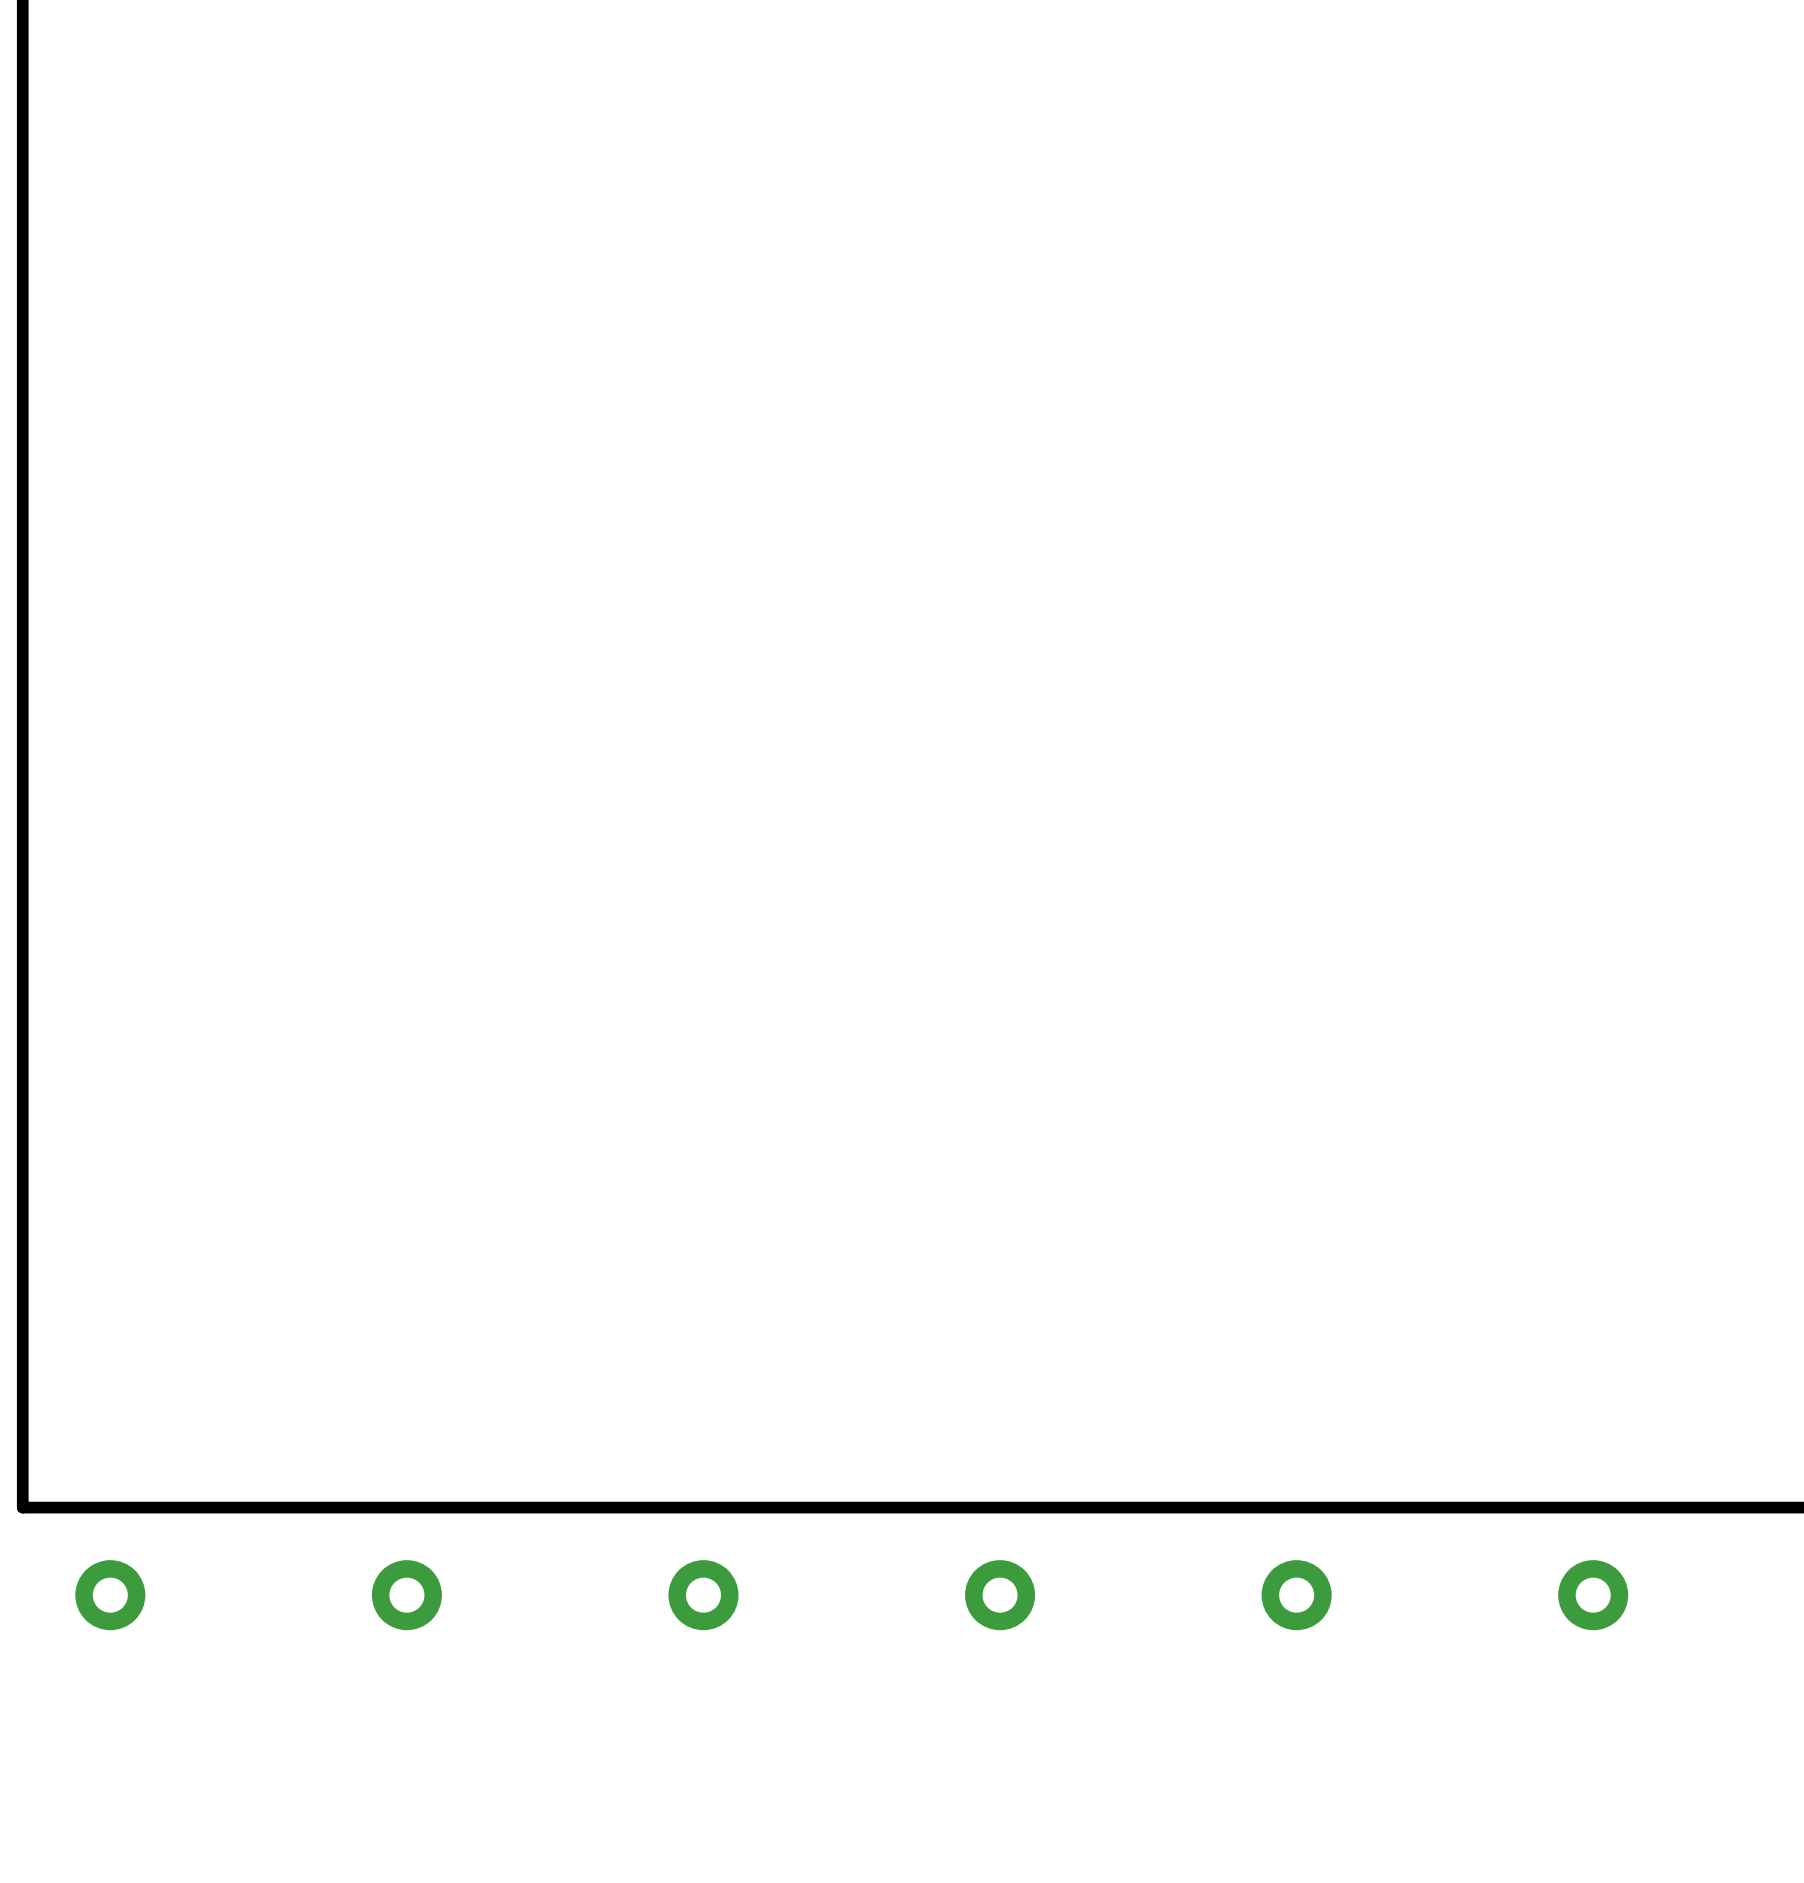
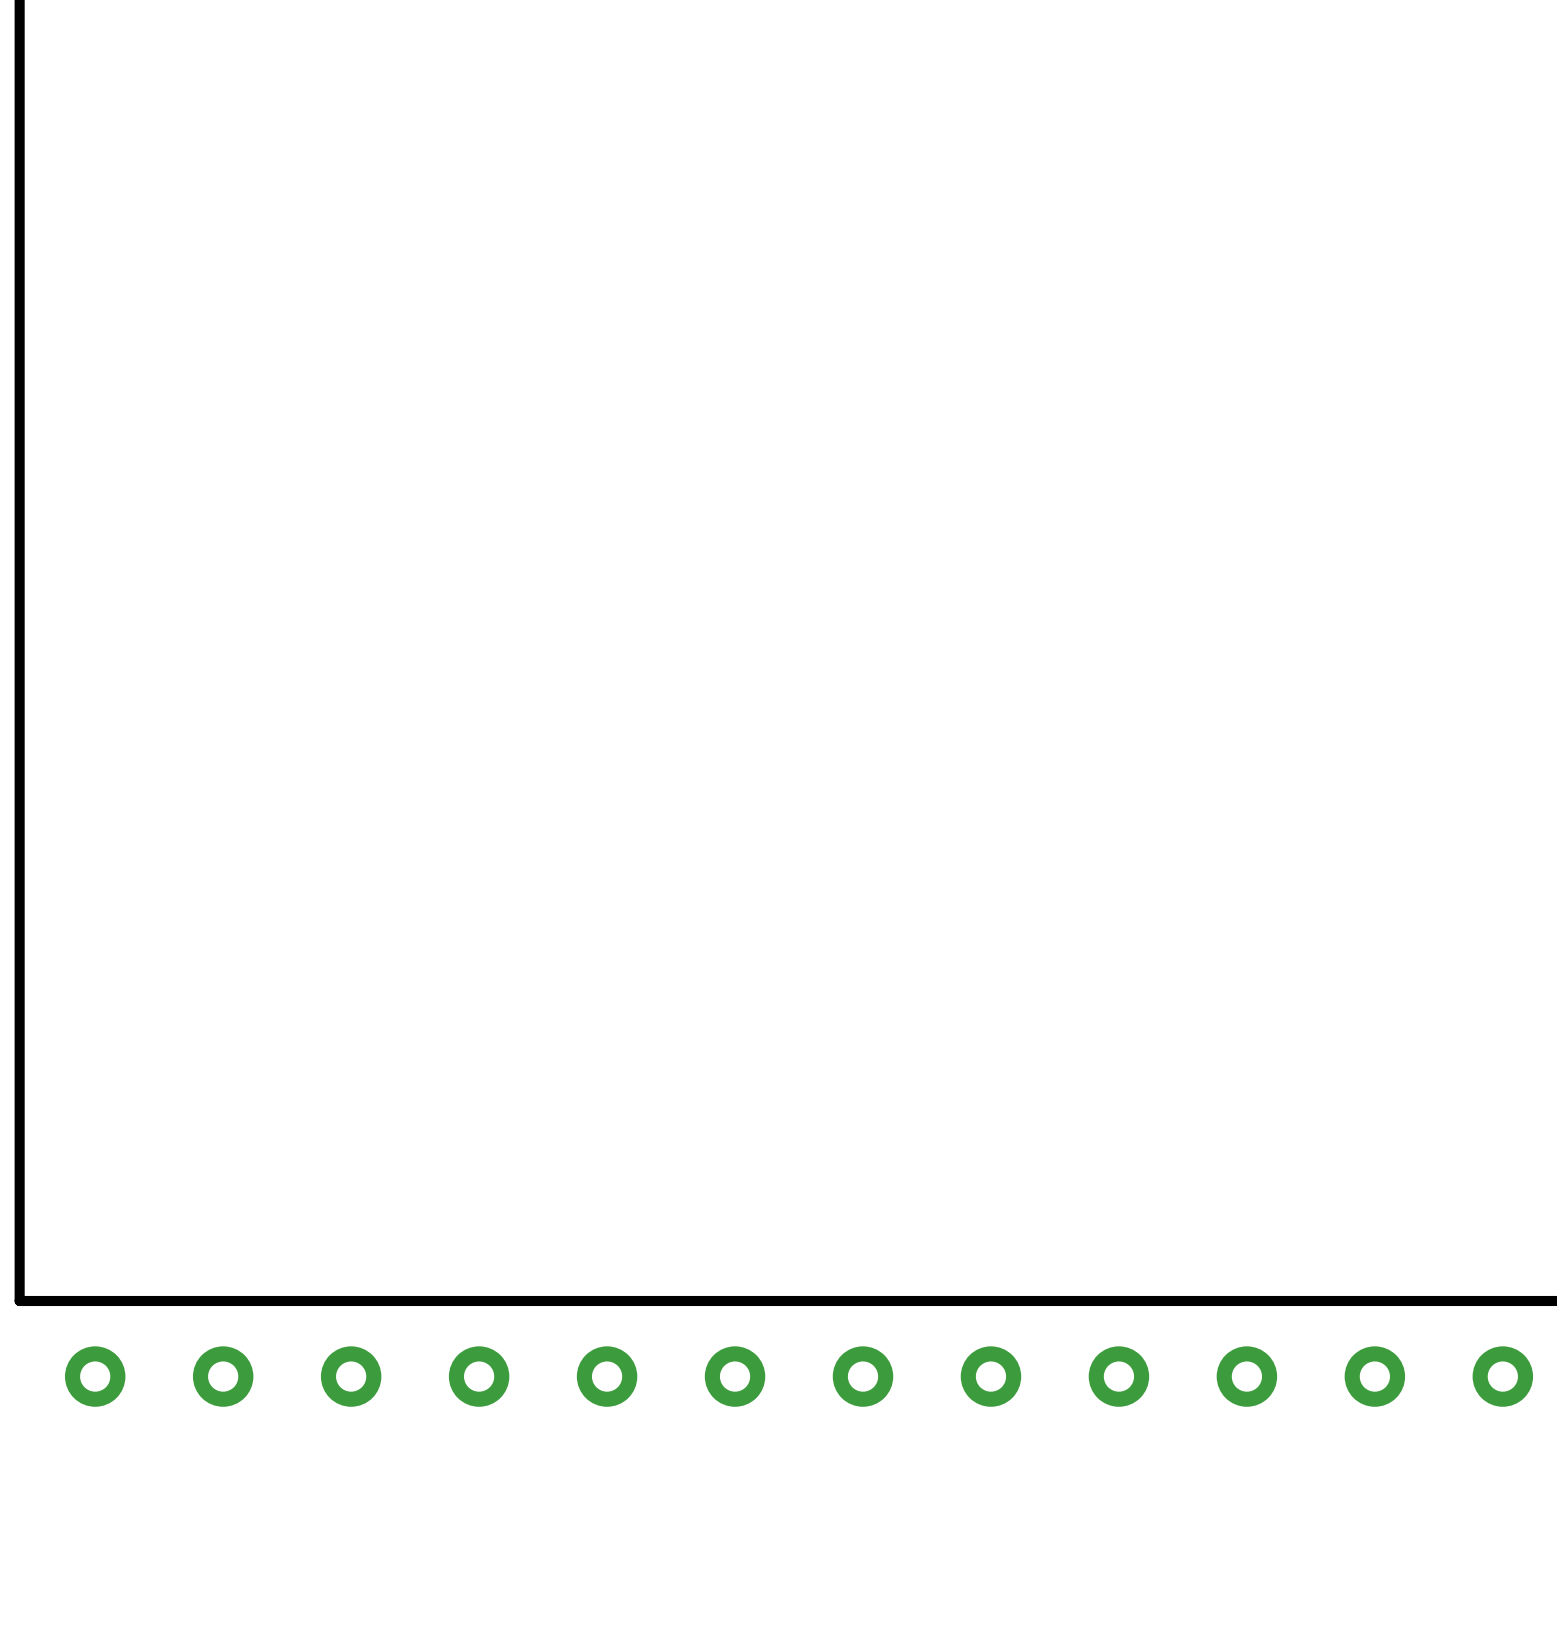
via: none -> (223, 1376)
via: none -> (479, 1376)
via: none -> (735, 1376)
via: none -> (990, 1376)
via: none -> (1246, 1376)
via: none -> (1502, 1376)

